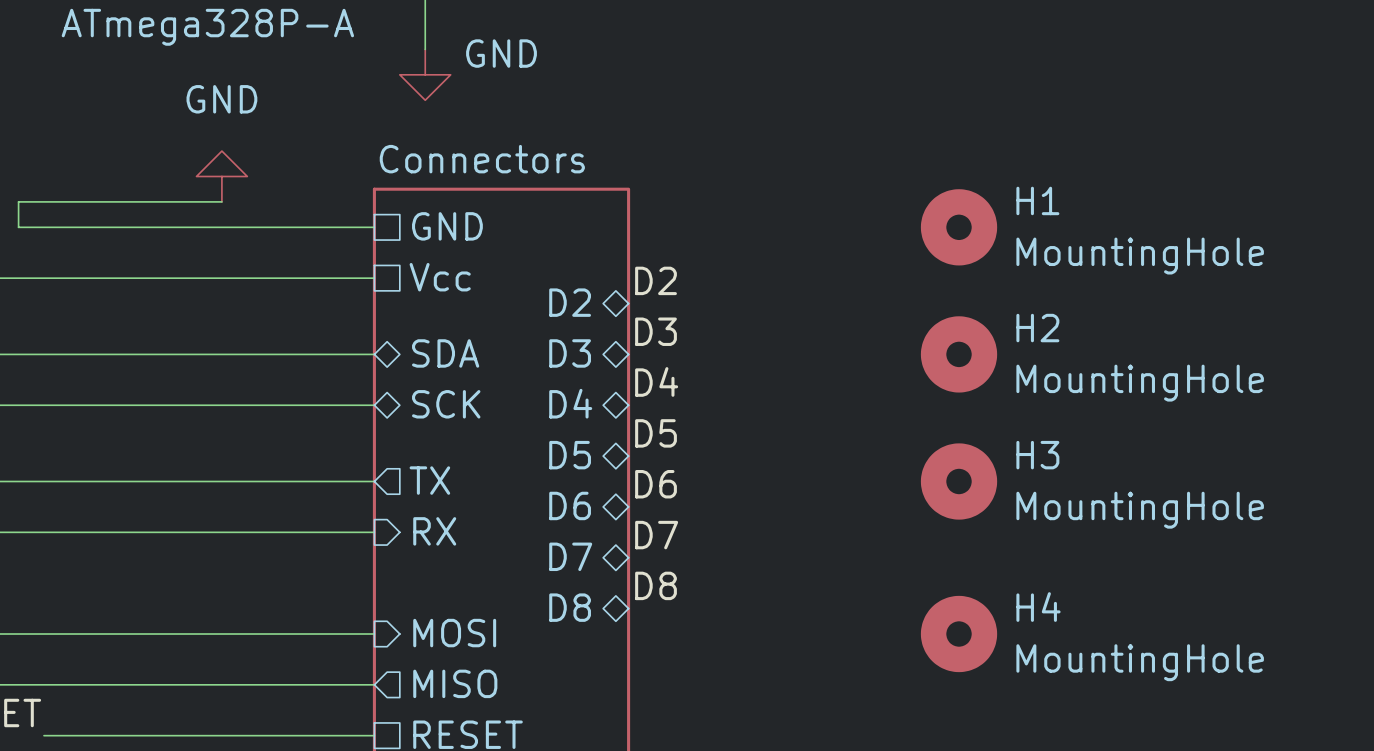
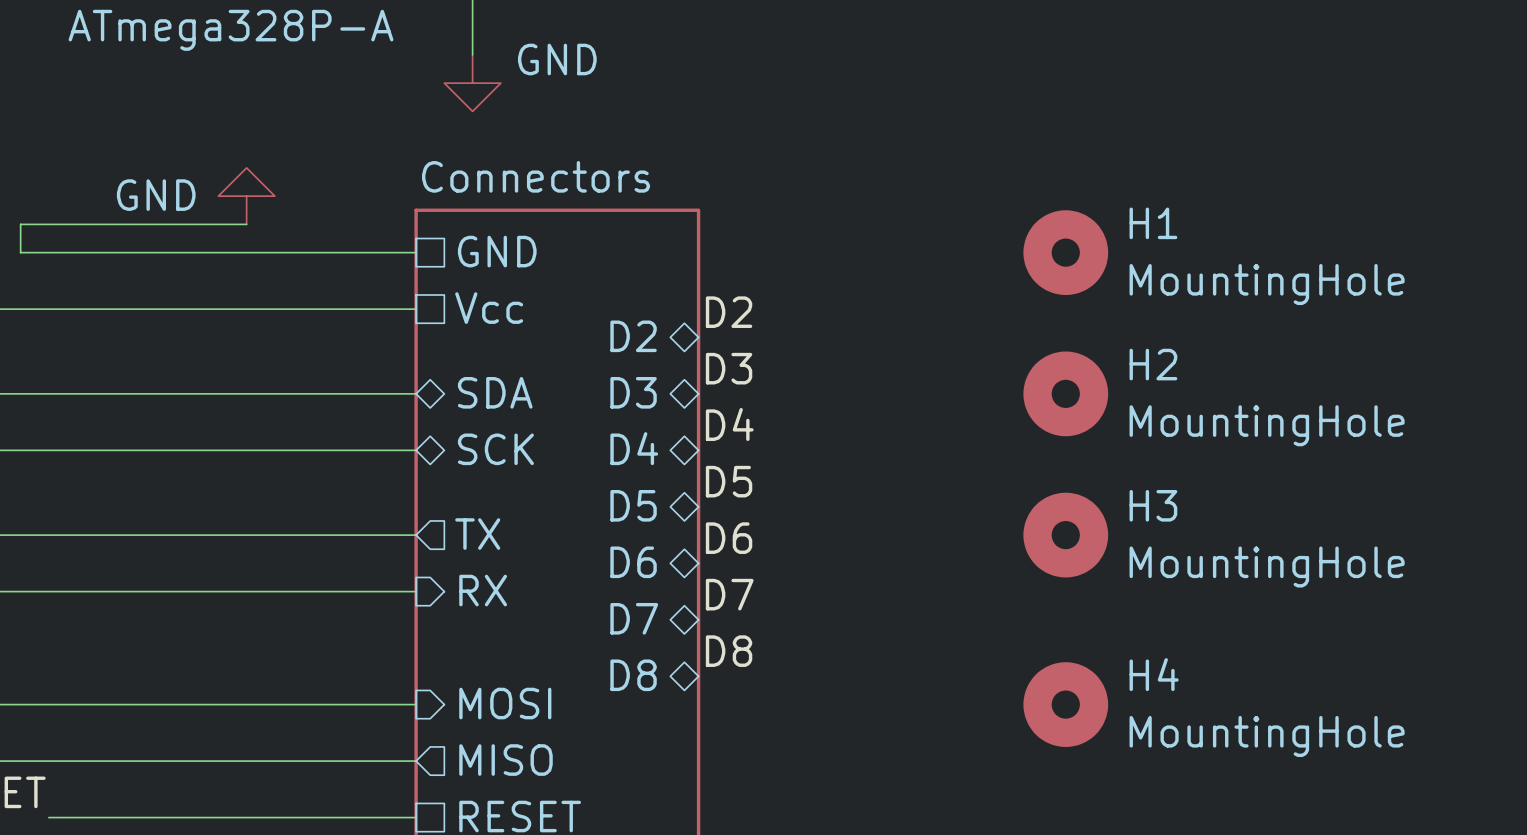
power symbol text position: GND (221, 99) -> GND (156, 195)

